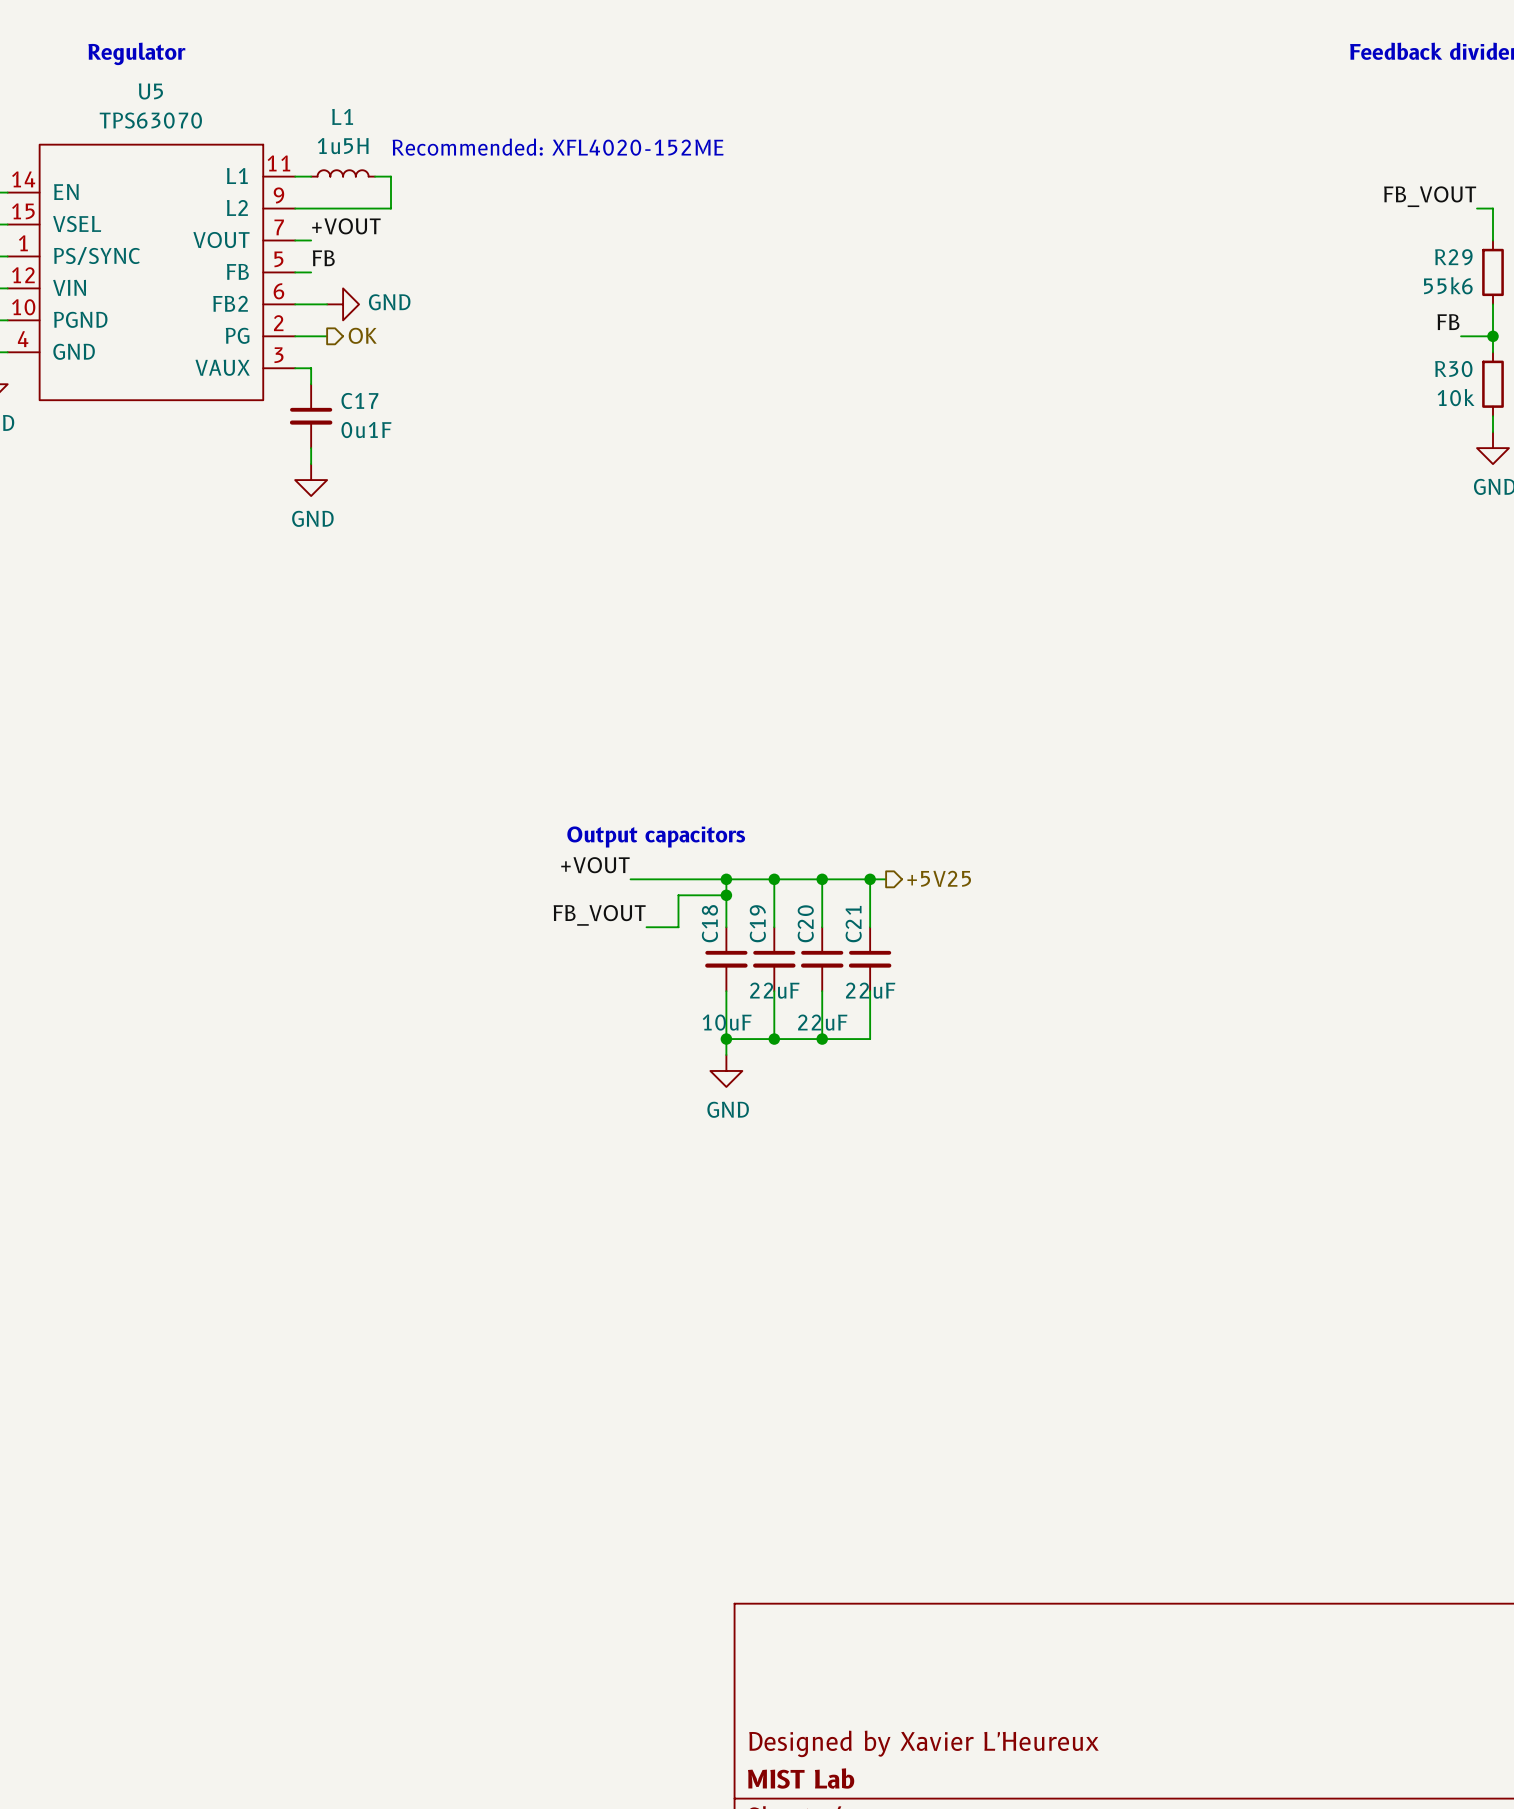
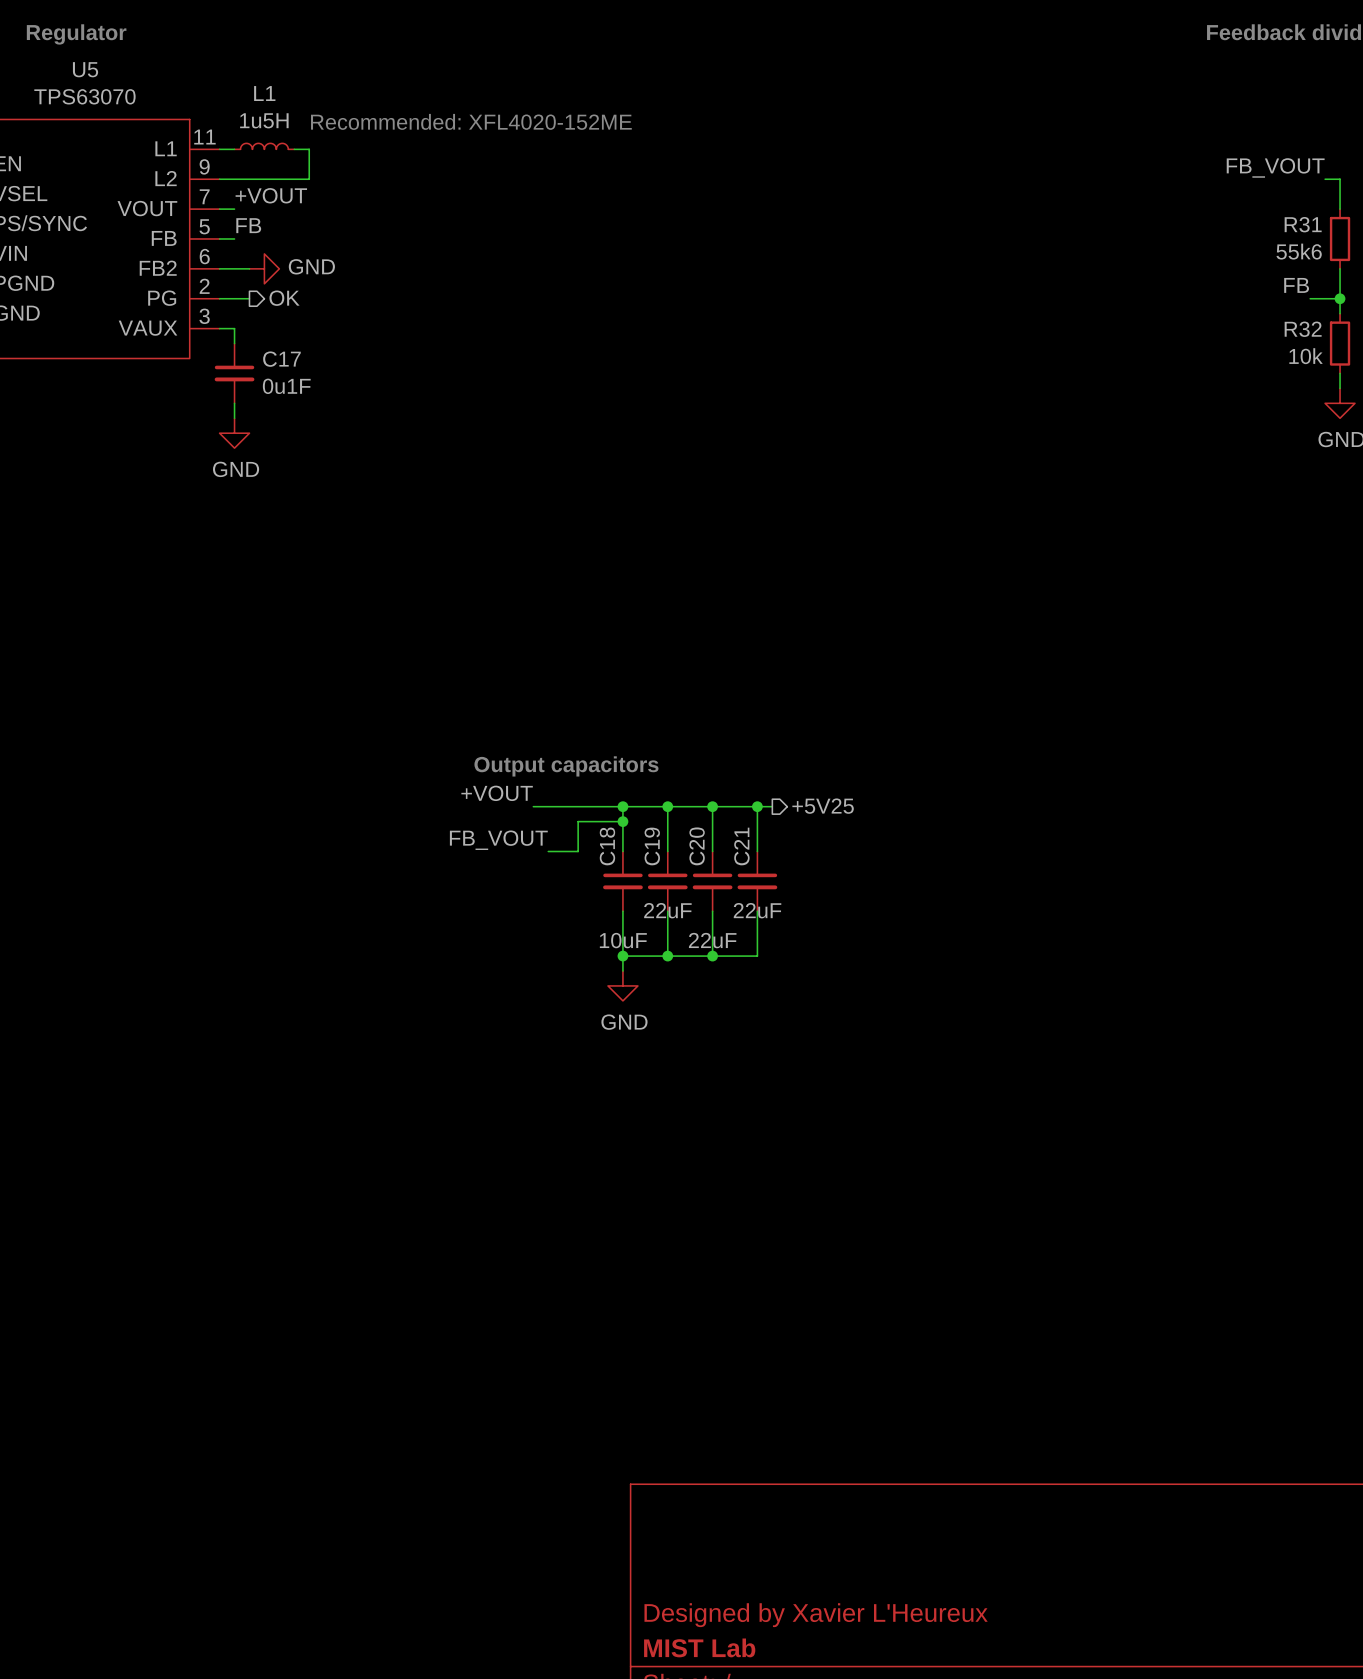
R29 name: R29 (1453, 257) -> R31 (1303, 224)
R30 name: R30 (1453, 369) -> R32 (1303, 329)

